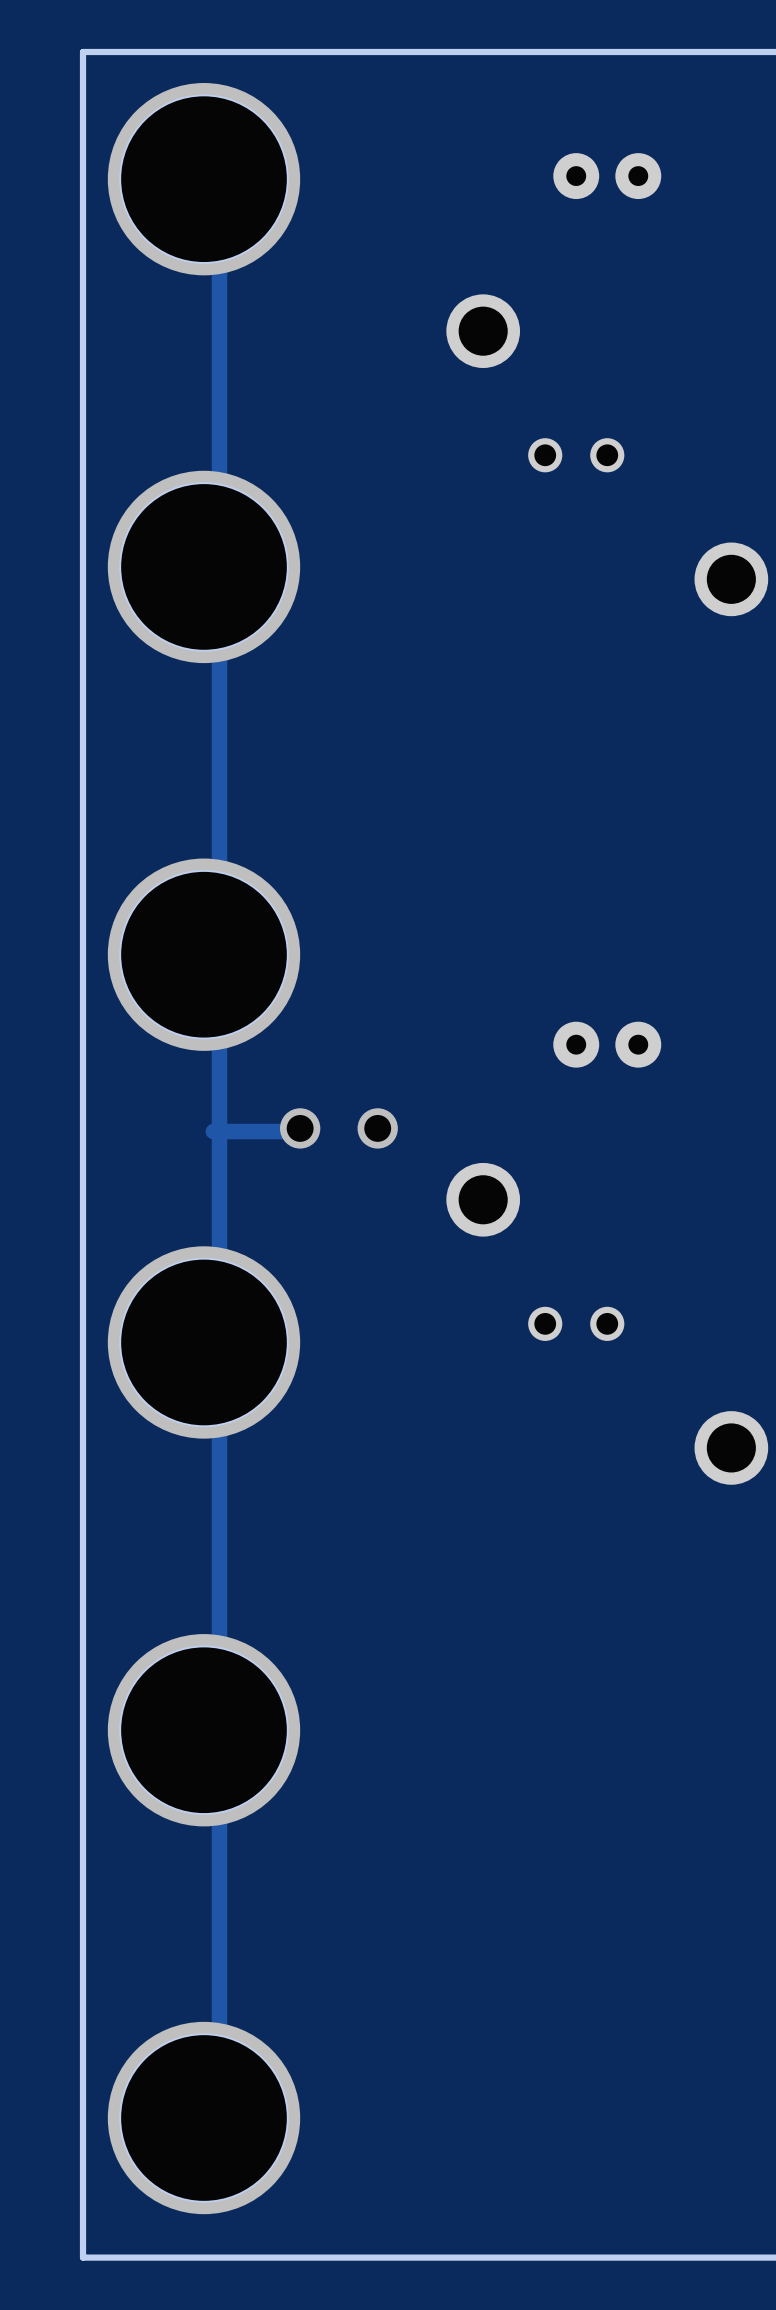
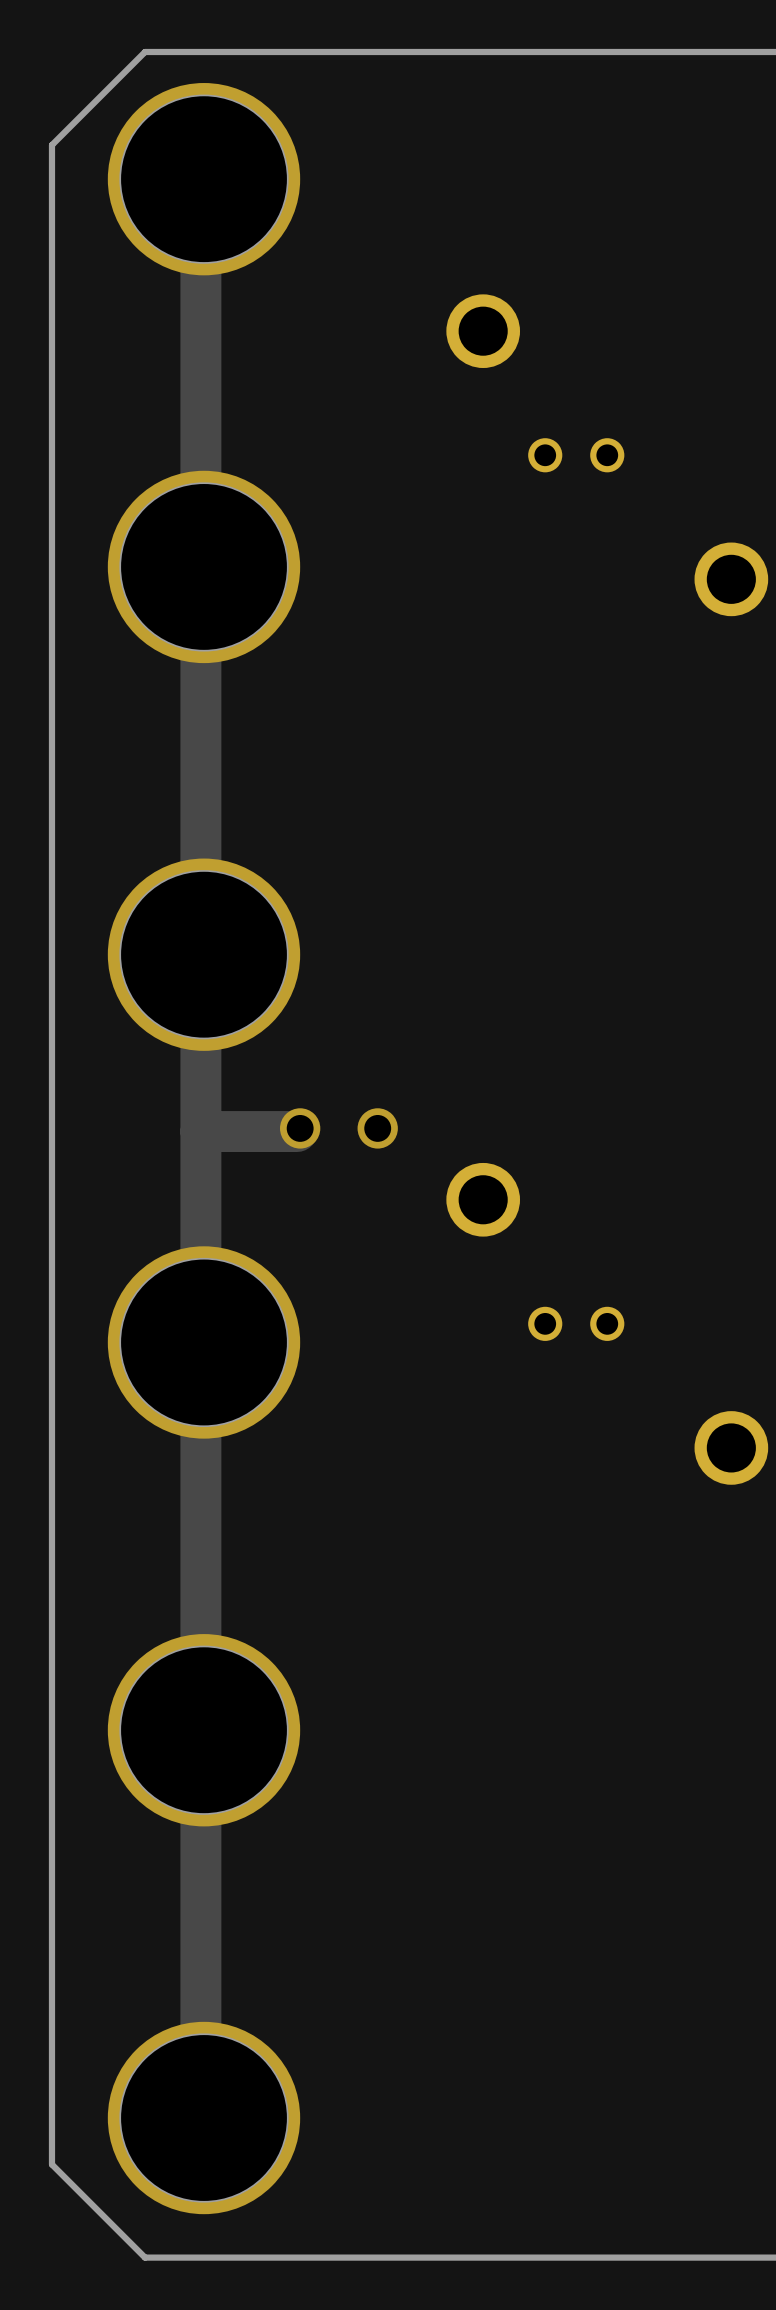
board edge: (145, 51) (83, 51) (83, 2257) (145, 2257) -> (145, 51) (51, 145) (51, 2164) (145, 2257)
track: (203, 176) (219, 191) (219, 2074) (235, 2090) -> none
part: (607, 176) -> none
track: none -> (200, 191) (200, 2130)
part: (607, 1044) -> none
track width: thin (297, 1131) (213, 1131) -> thick (297, 1131) (213, 1131)

